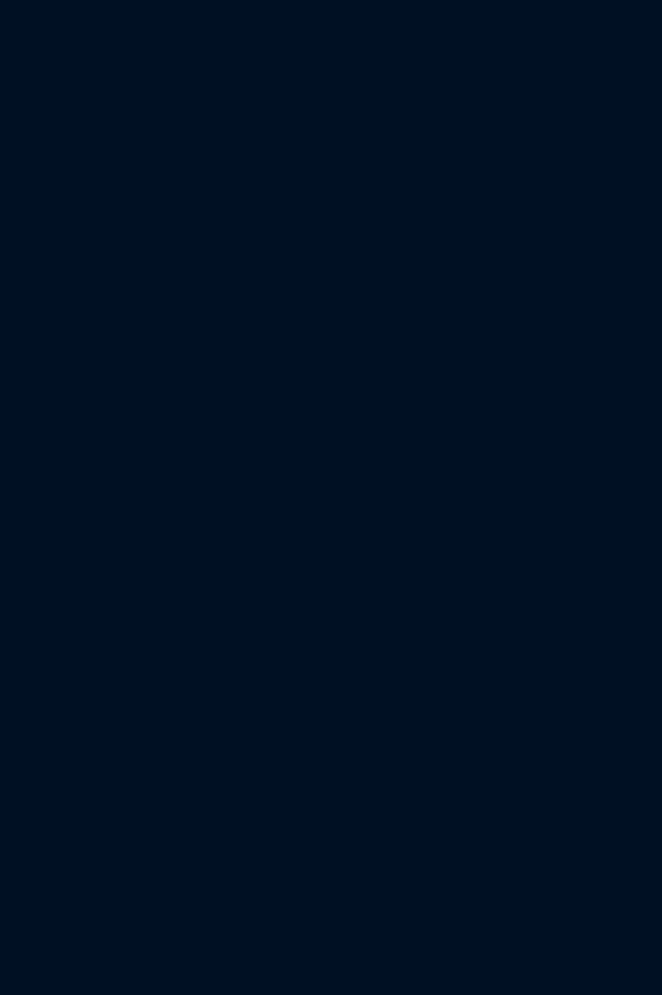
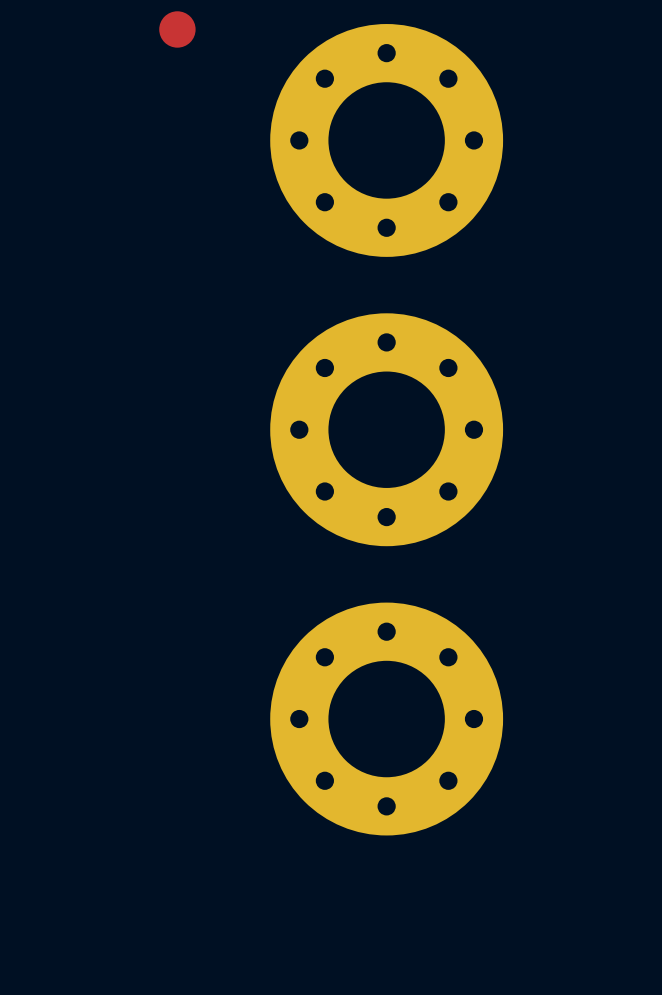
part: none -> (177, 29)
part: none -> (386, 140)
part: none -> (386, 429)
part: none -> (386, 719)

